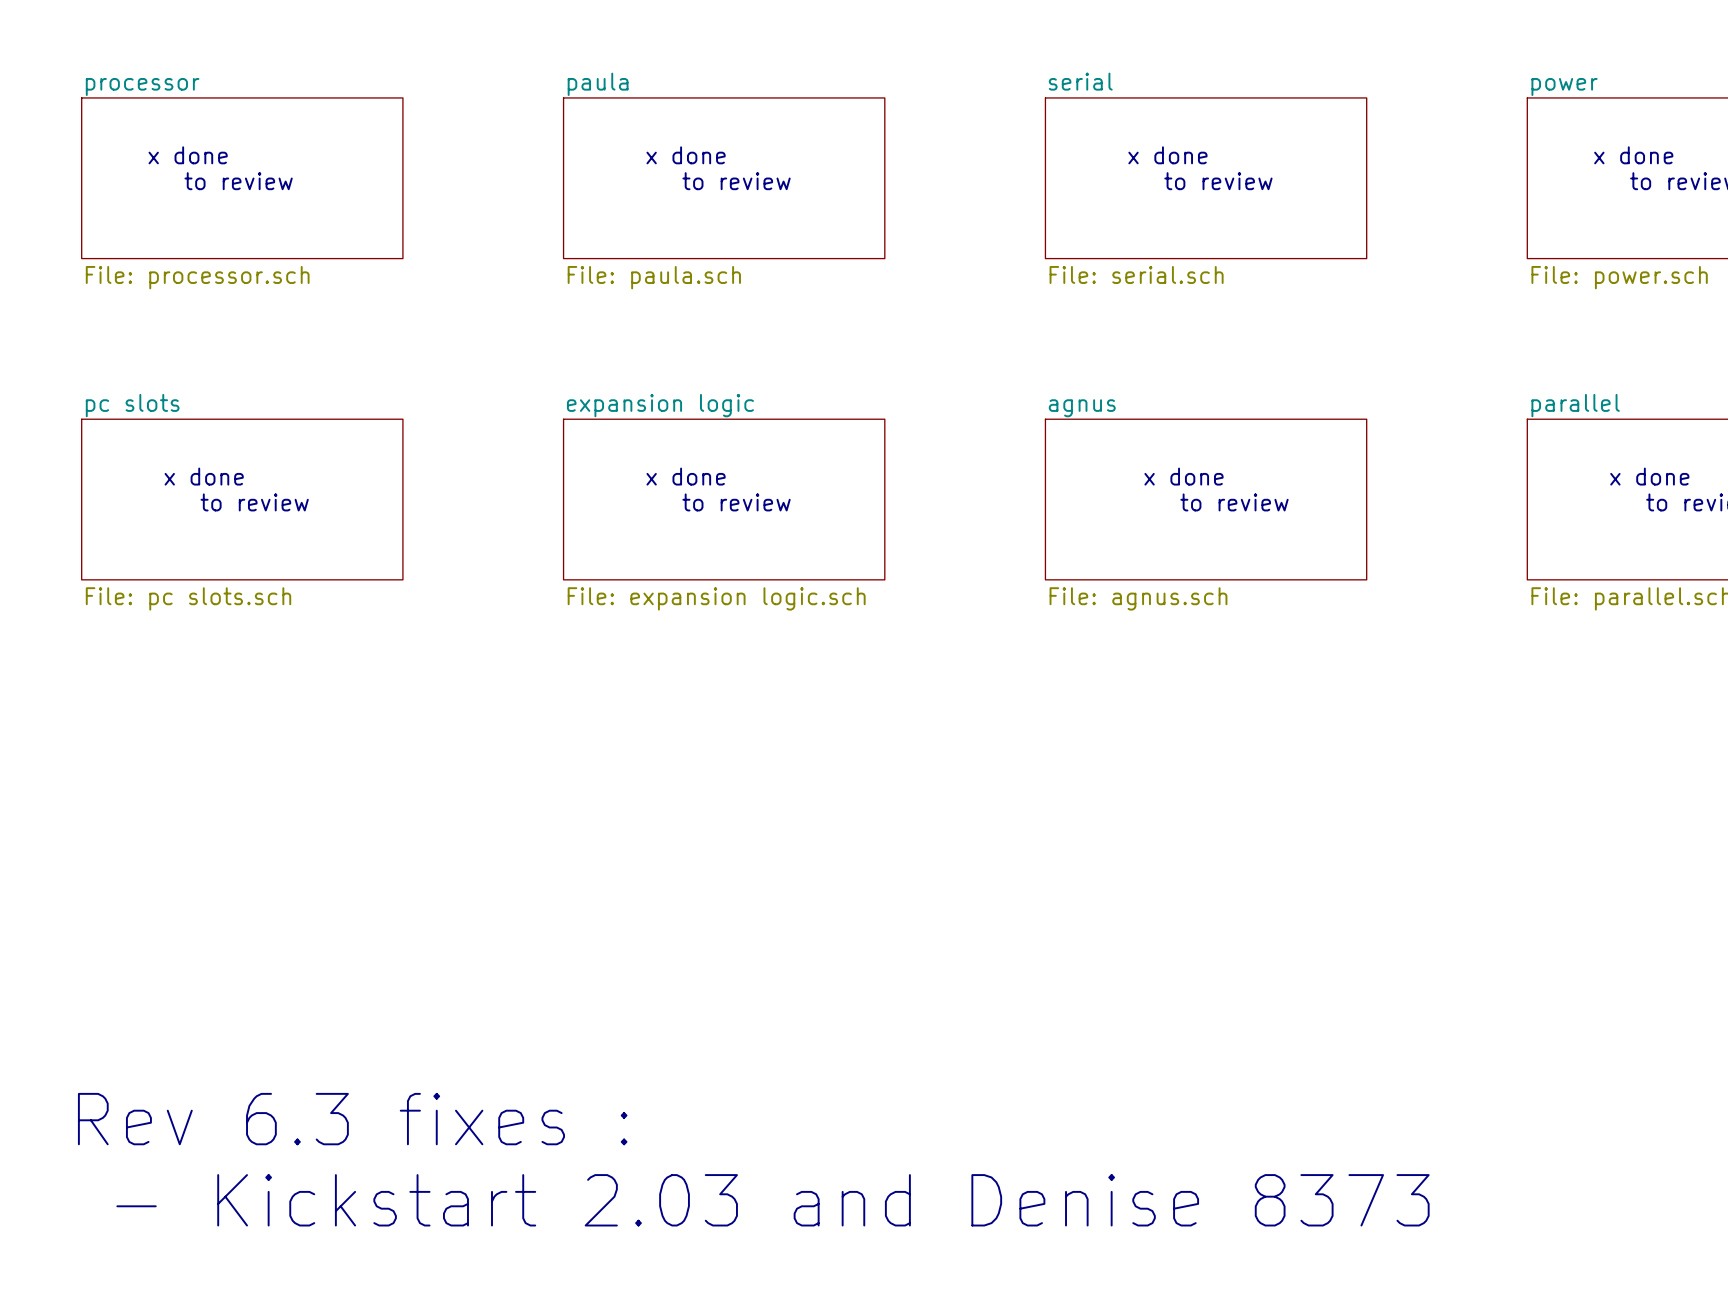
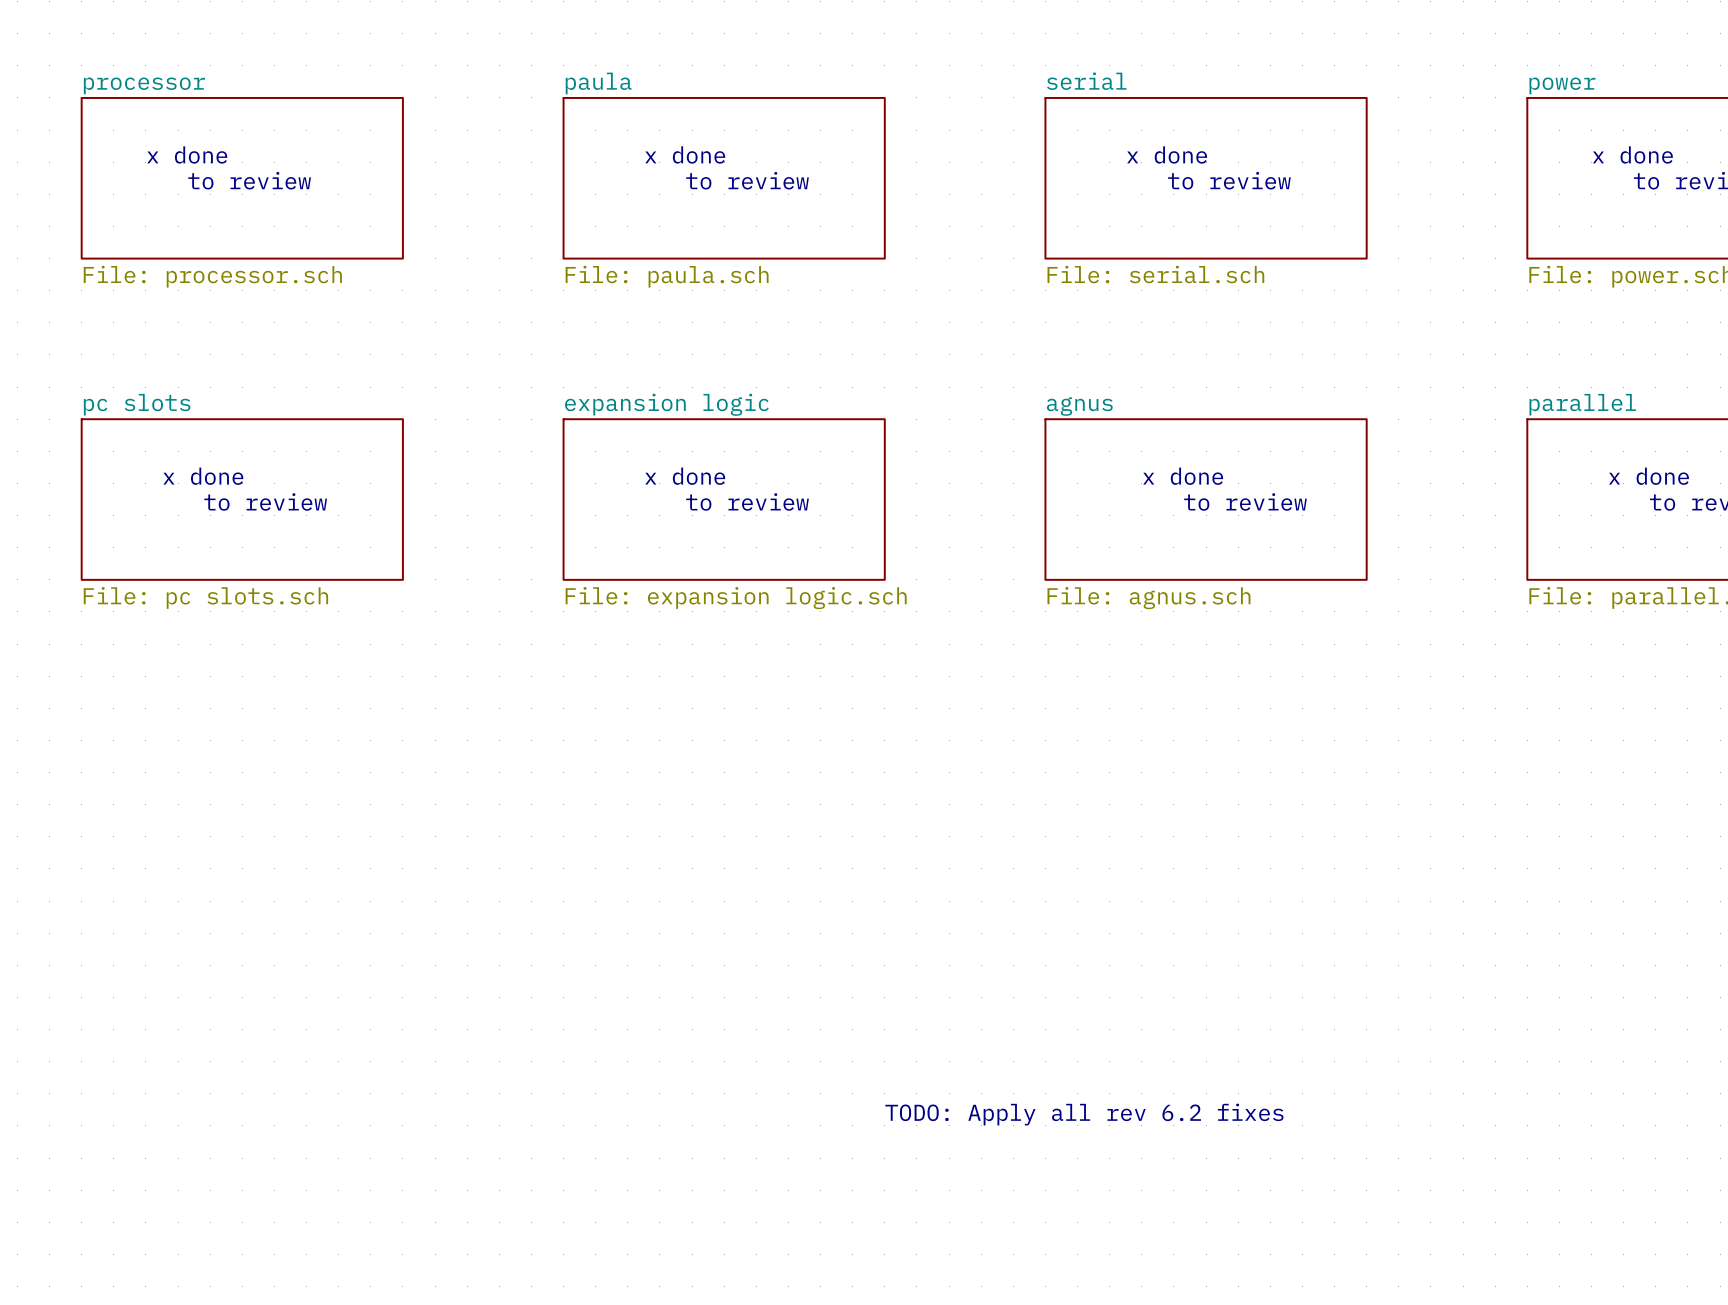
text: none -> TODO: Apply all rev 6.2 fixes (1084, 1114)
text: Rev 6.3 fixes : (352, 1119) -> none
text: - Kickstart 2.03 and Denise 8373 (772, 1200) -> none

